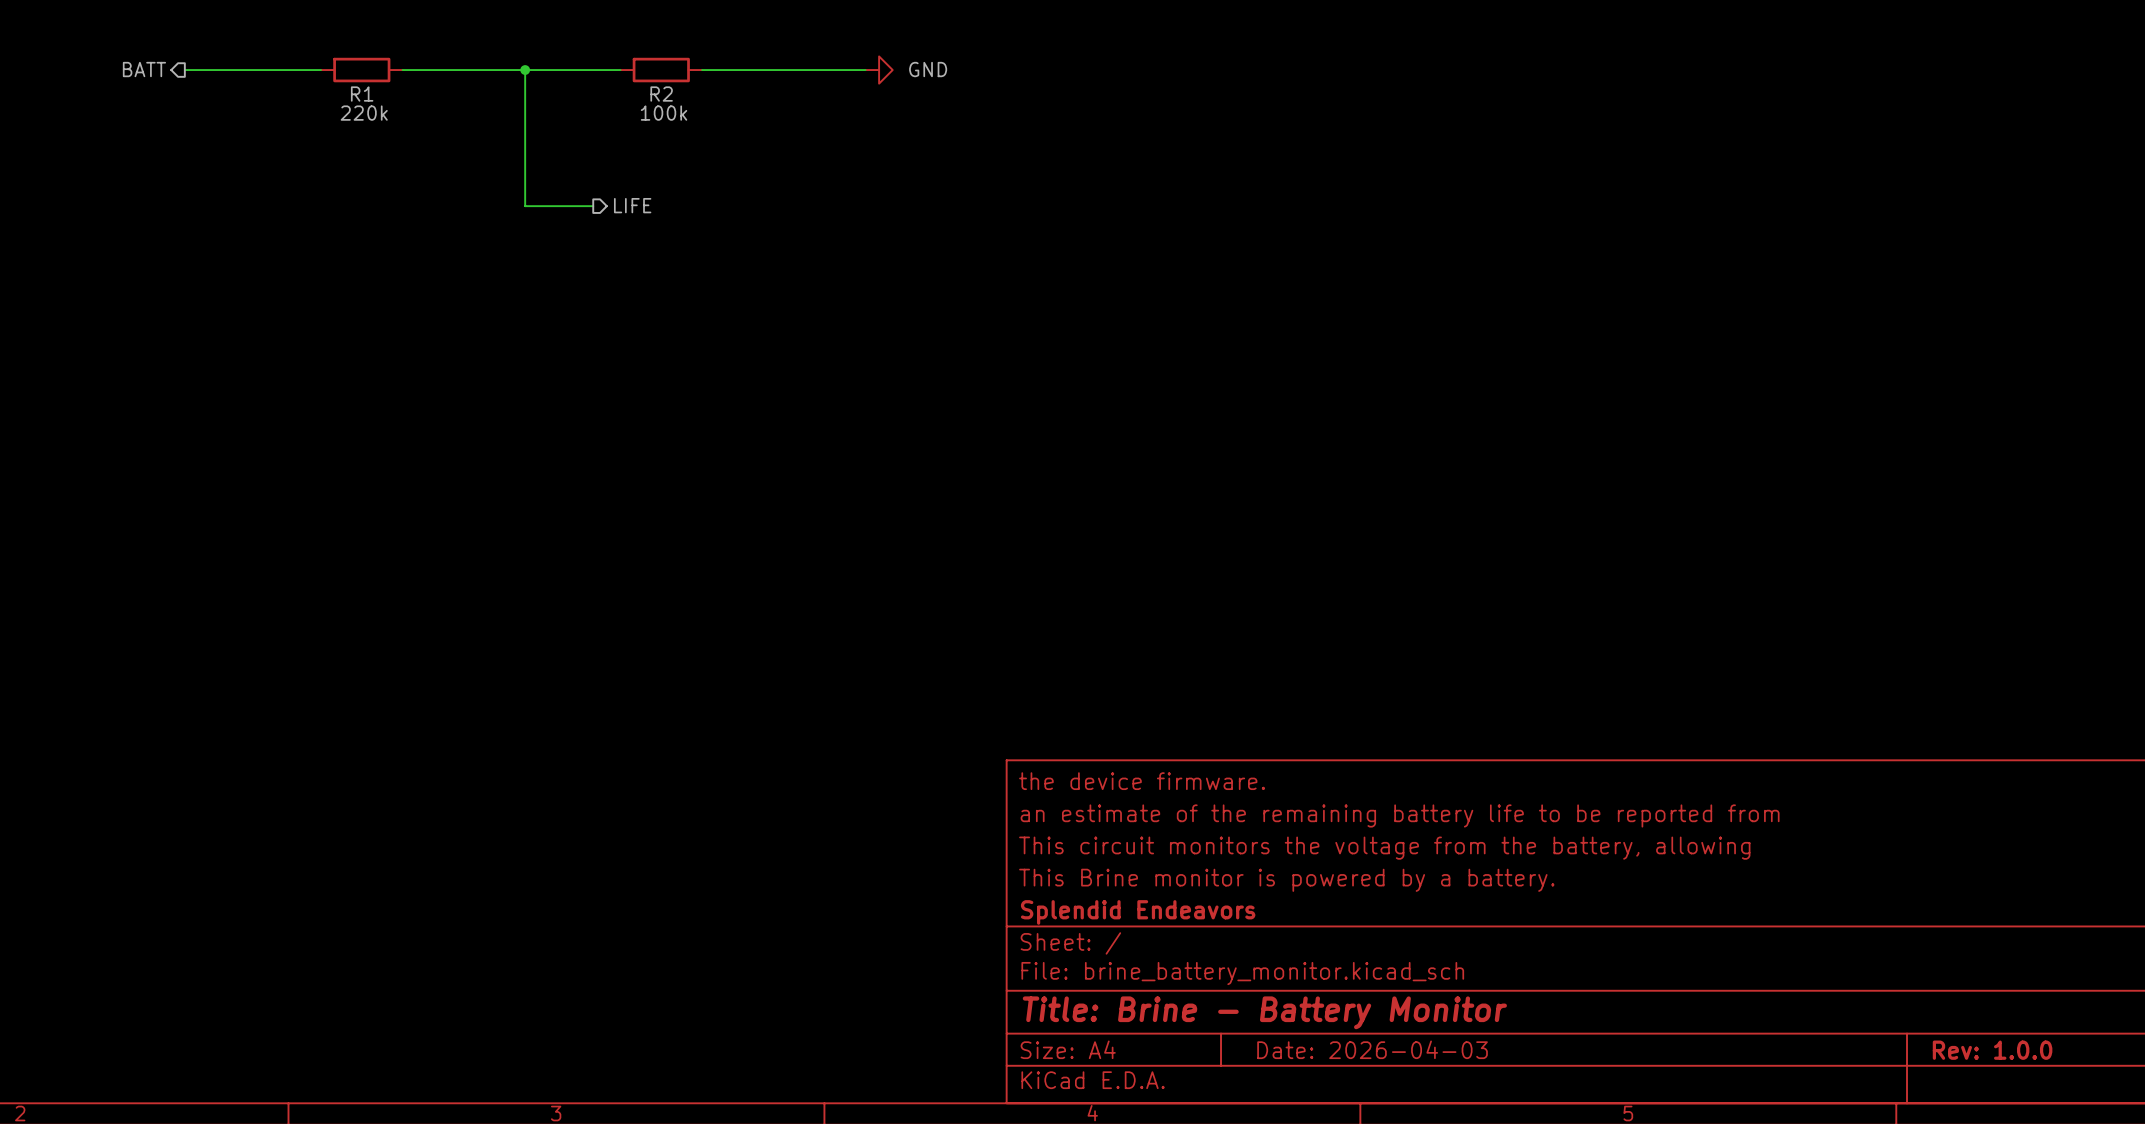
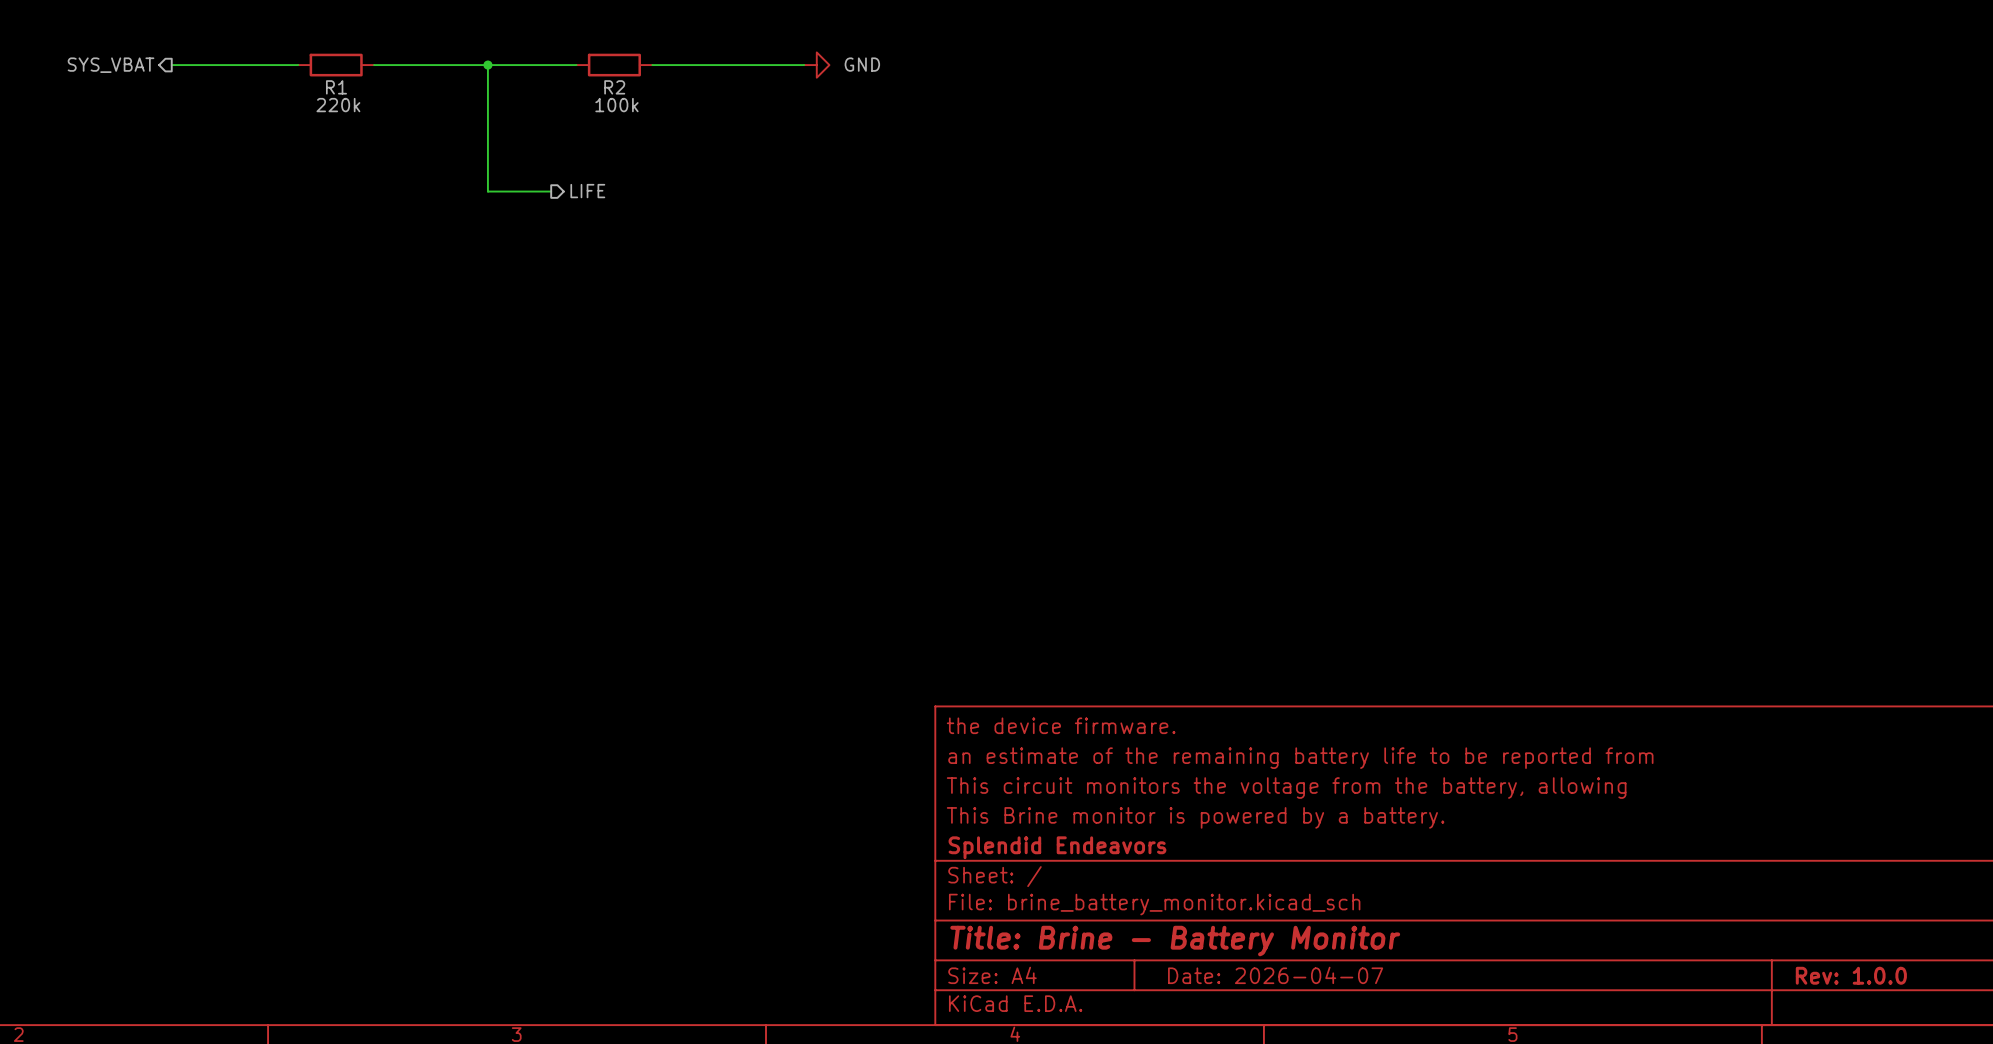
hierarchical label: BATT (144, 69) -> SYS_VBAT (111, 65)
title block: Date: 2026-04-03 (1372, 1049) -> Date: 2026-04-07 (1275, 975)

